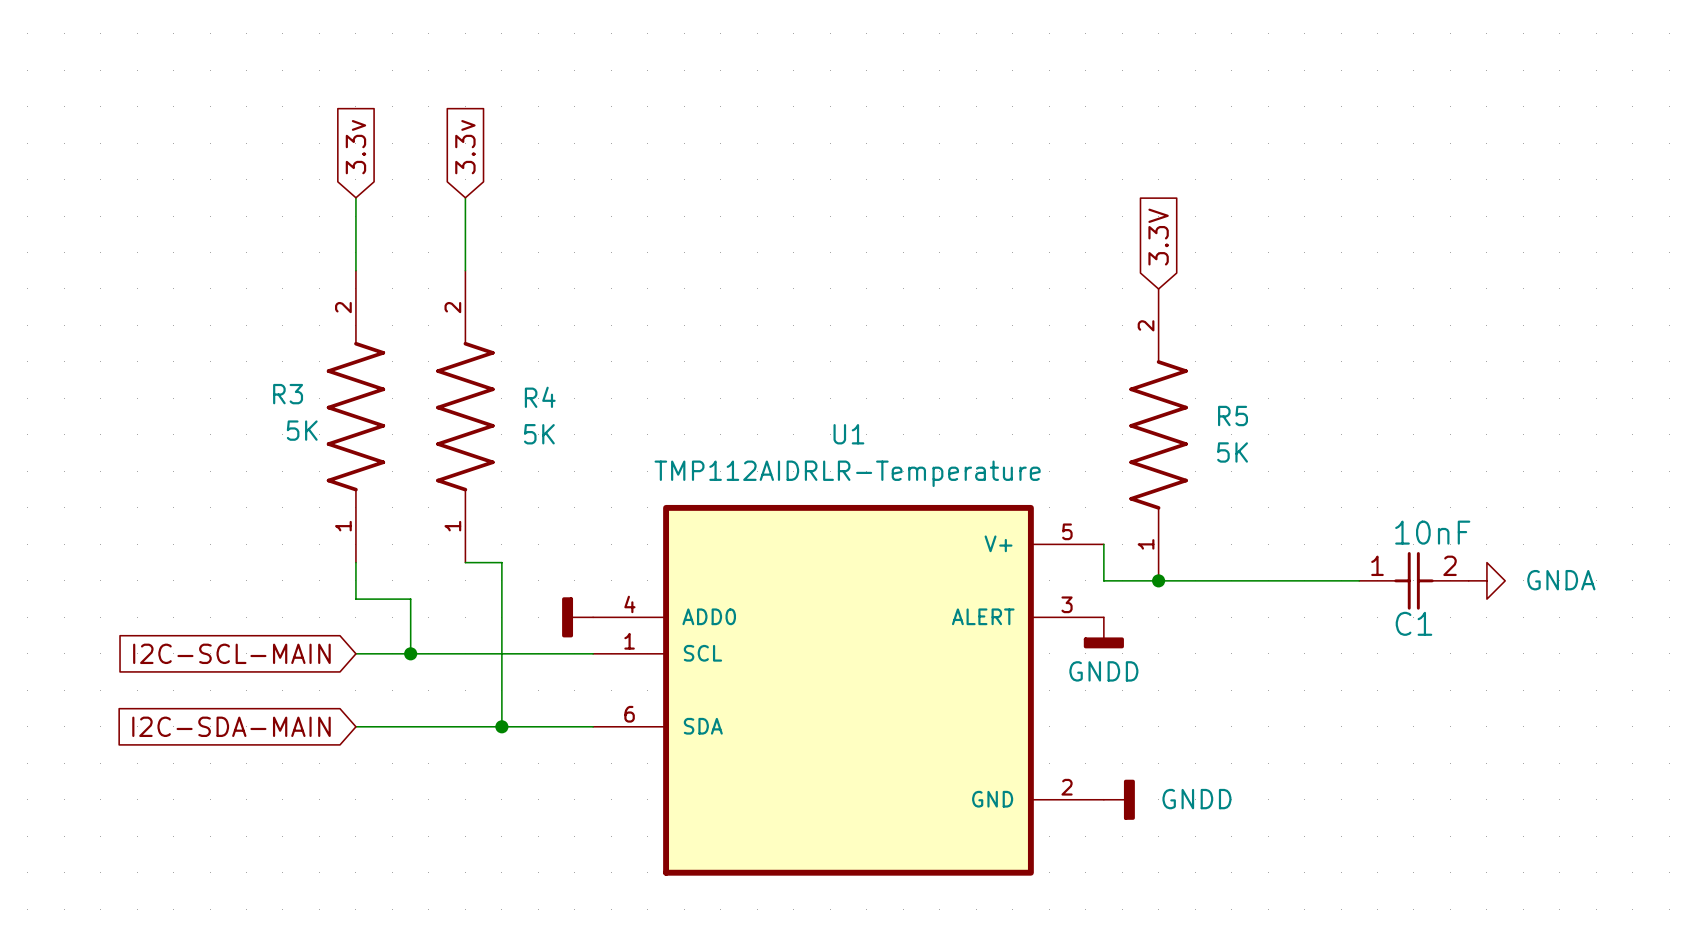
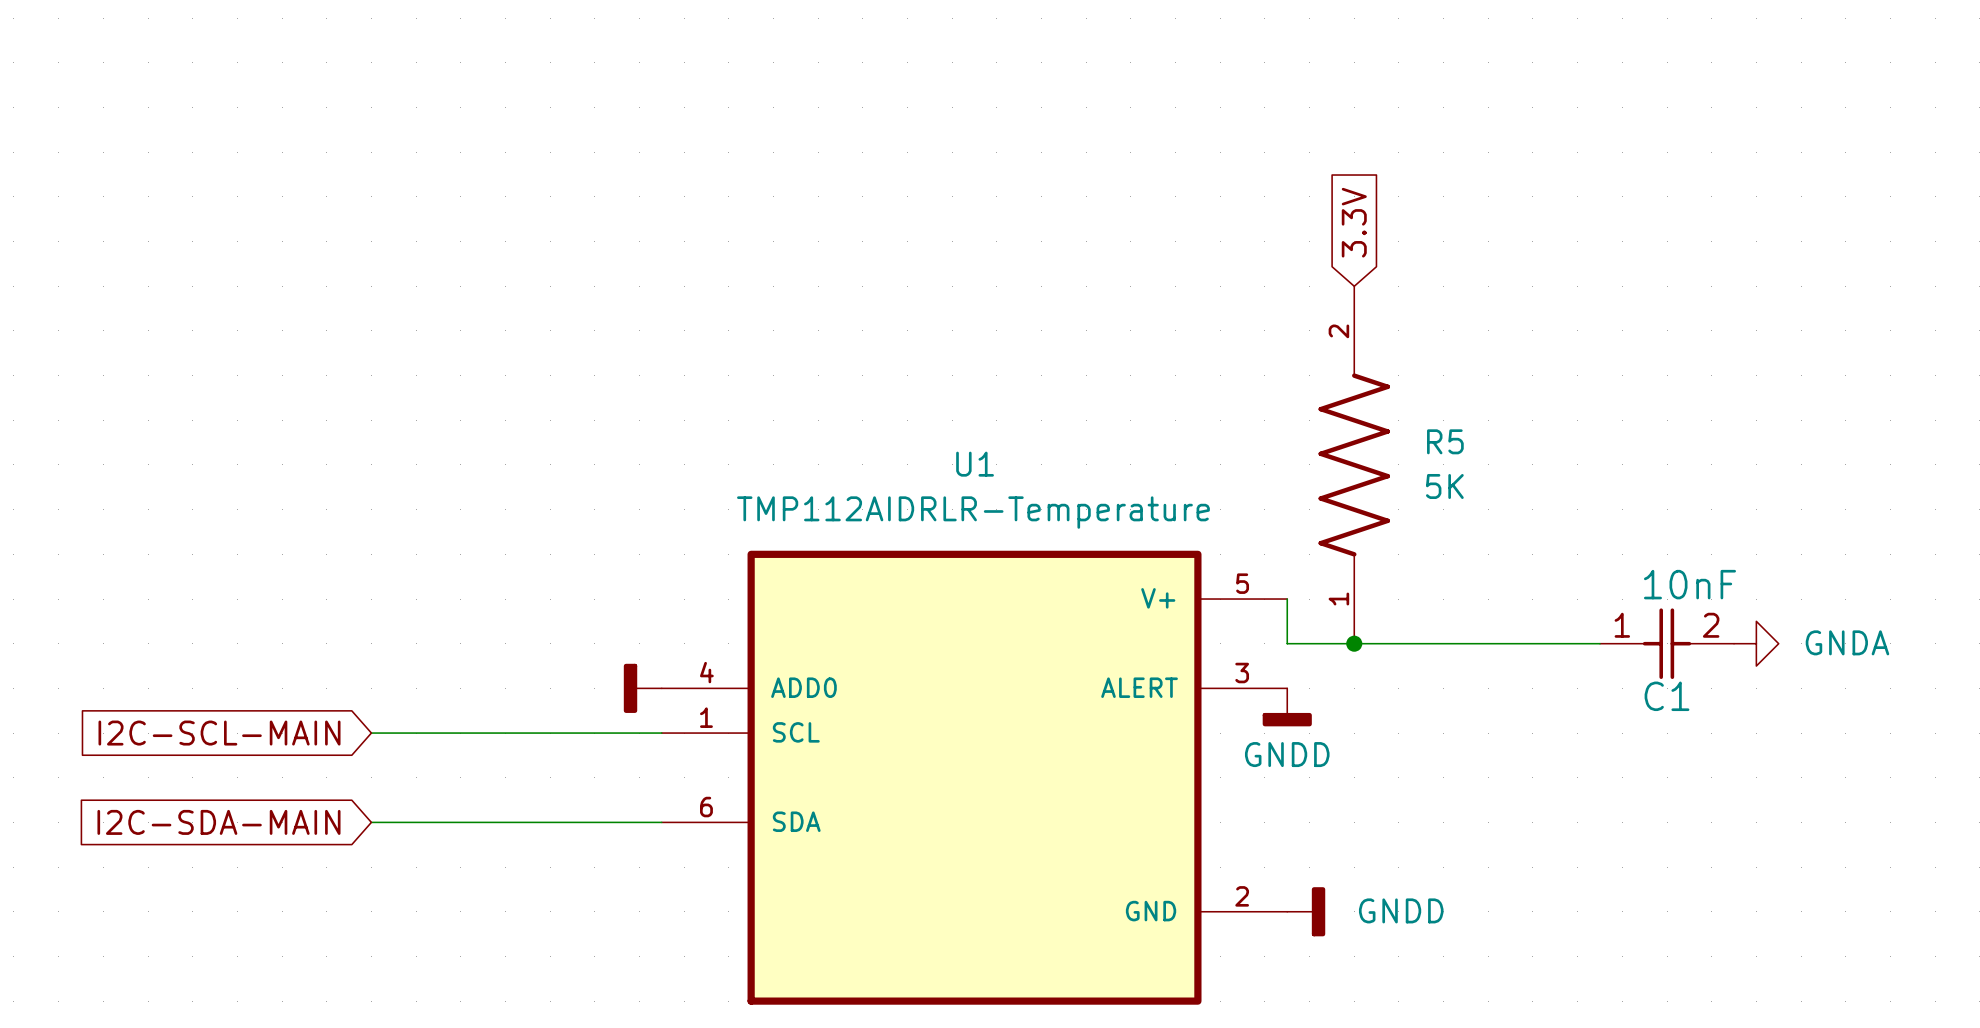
global label: 3.3v (355, 147) -> none
global label: 3.3v (465, 147) -> none
wire: (355, 197) (355, 270) -> none
wire: (465, 197) (465, 270) -> none
R3: 5K (355, 416) -> none
R4: 5K (465, 416) -> none
wire: (355, 562) (355, 599) (410, 599) (410, 653) -> none
wire: (465, 562) (501, 562) (501, 726) -> none
junction: (410, 653) -> none
junction: (501, 726) -> none

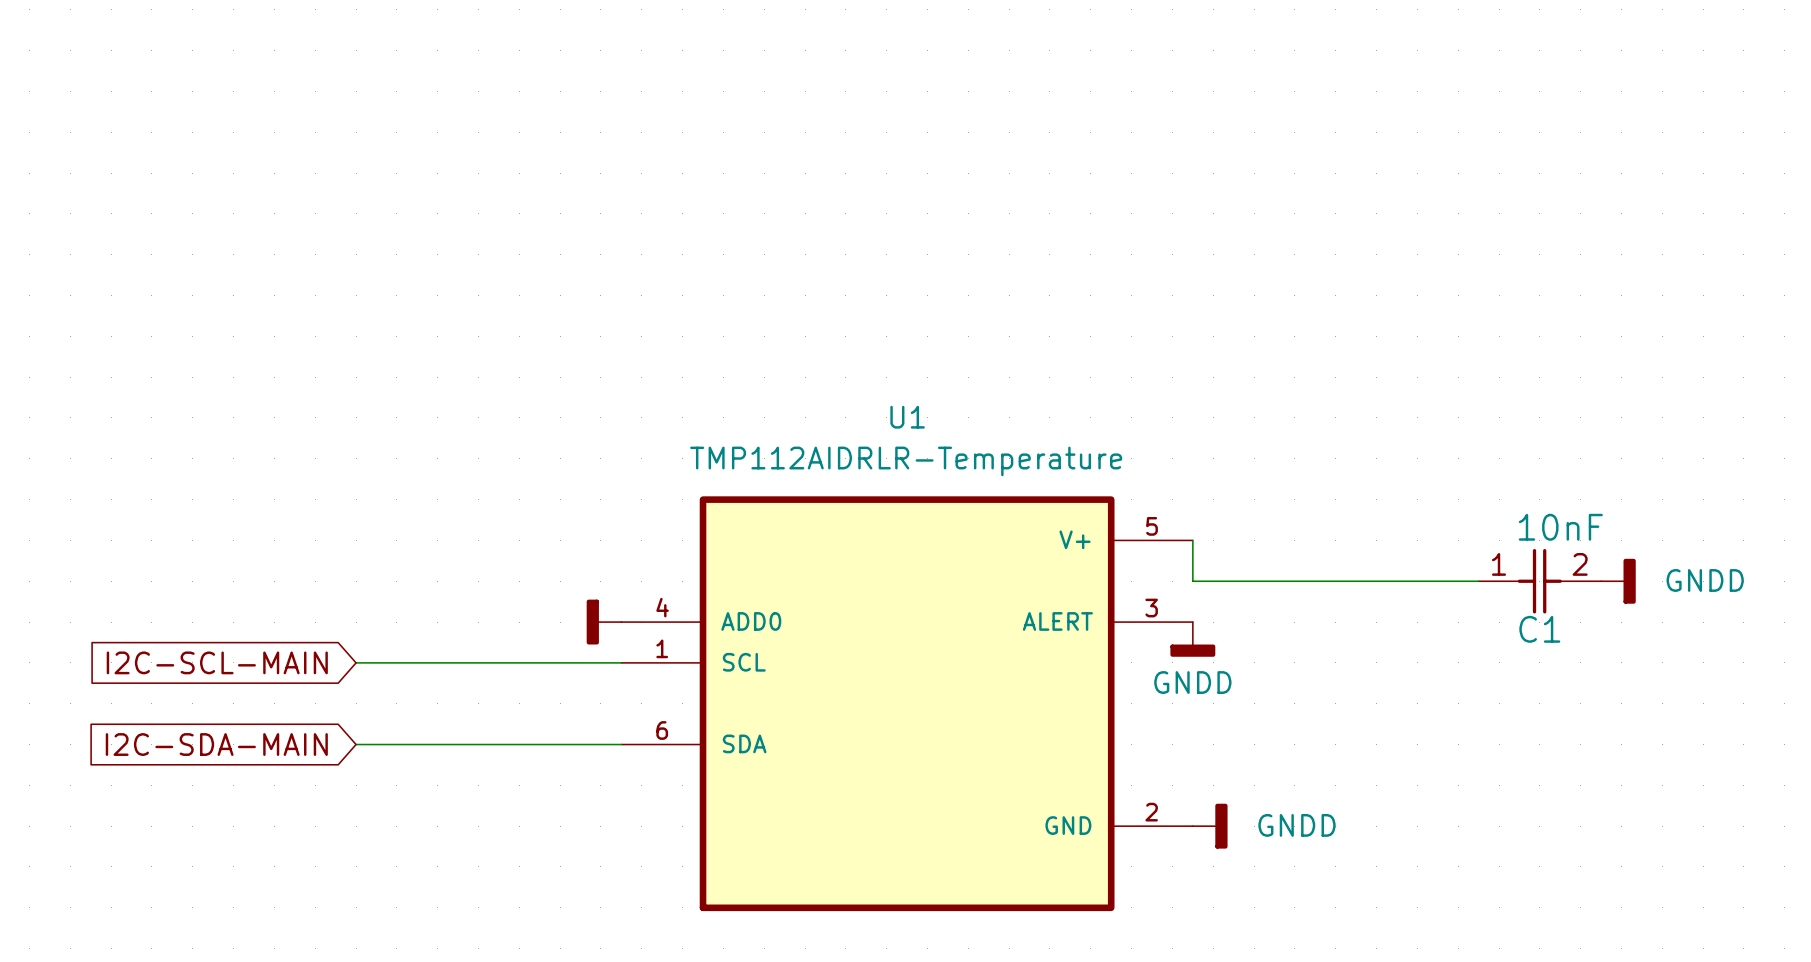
global label: 3.3V (1354, 222) -> none
R5: 5K (1354, 464) -> none
junction: (1354, 643) -> none
power symbol: GNDA (1756, 643) -> GNDD (1618, 581)

